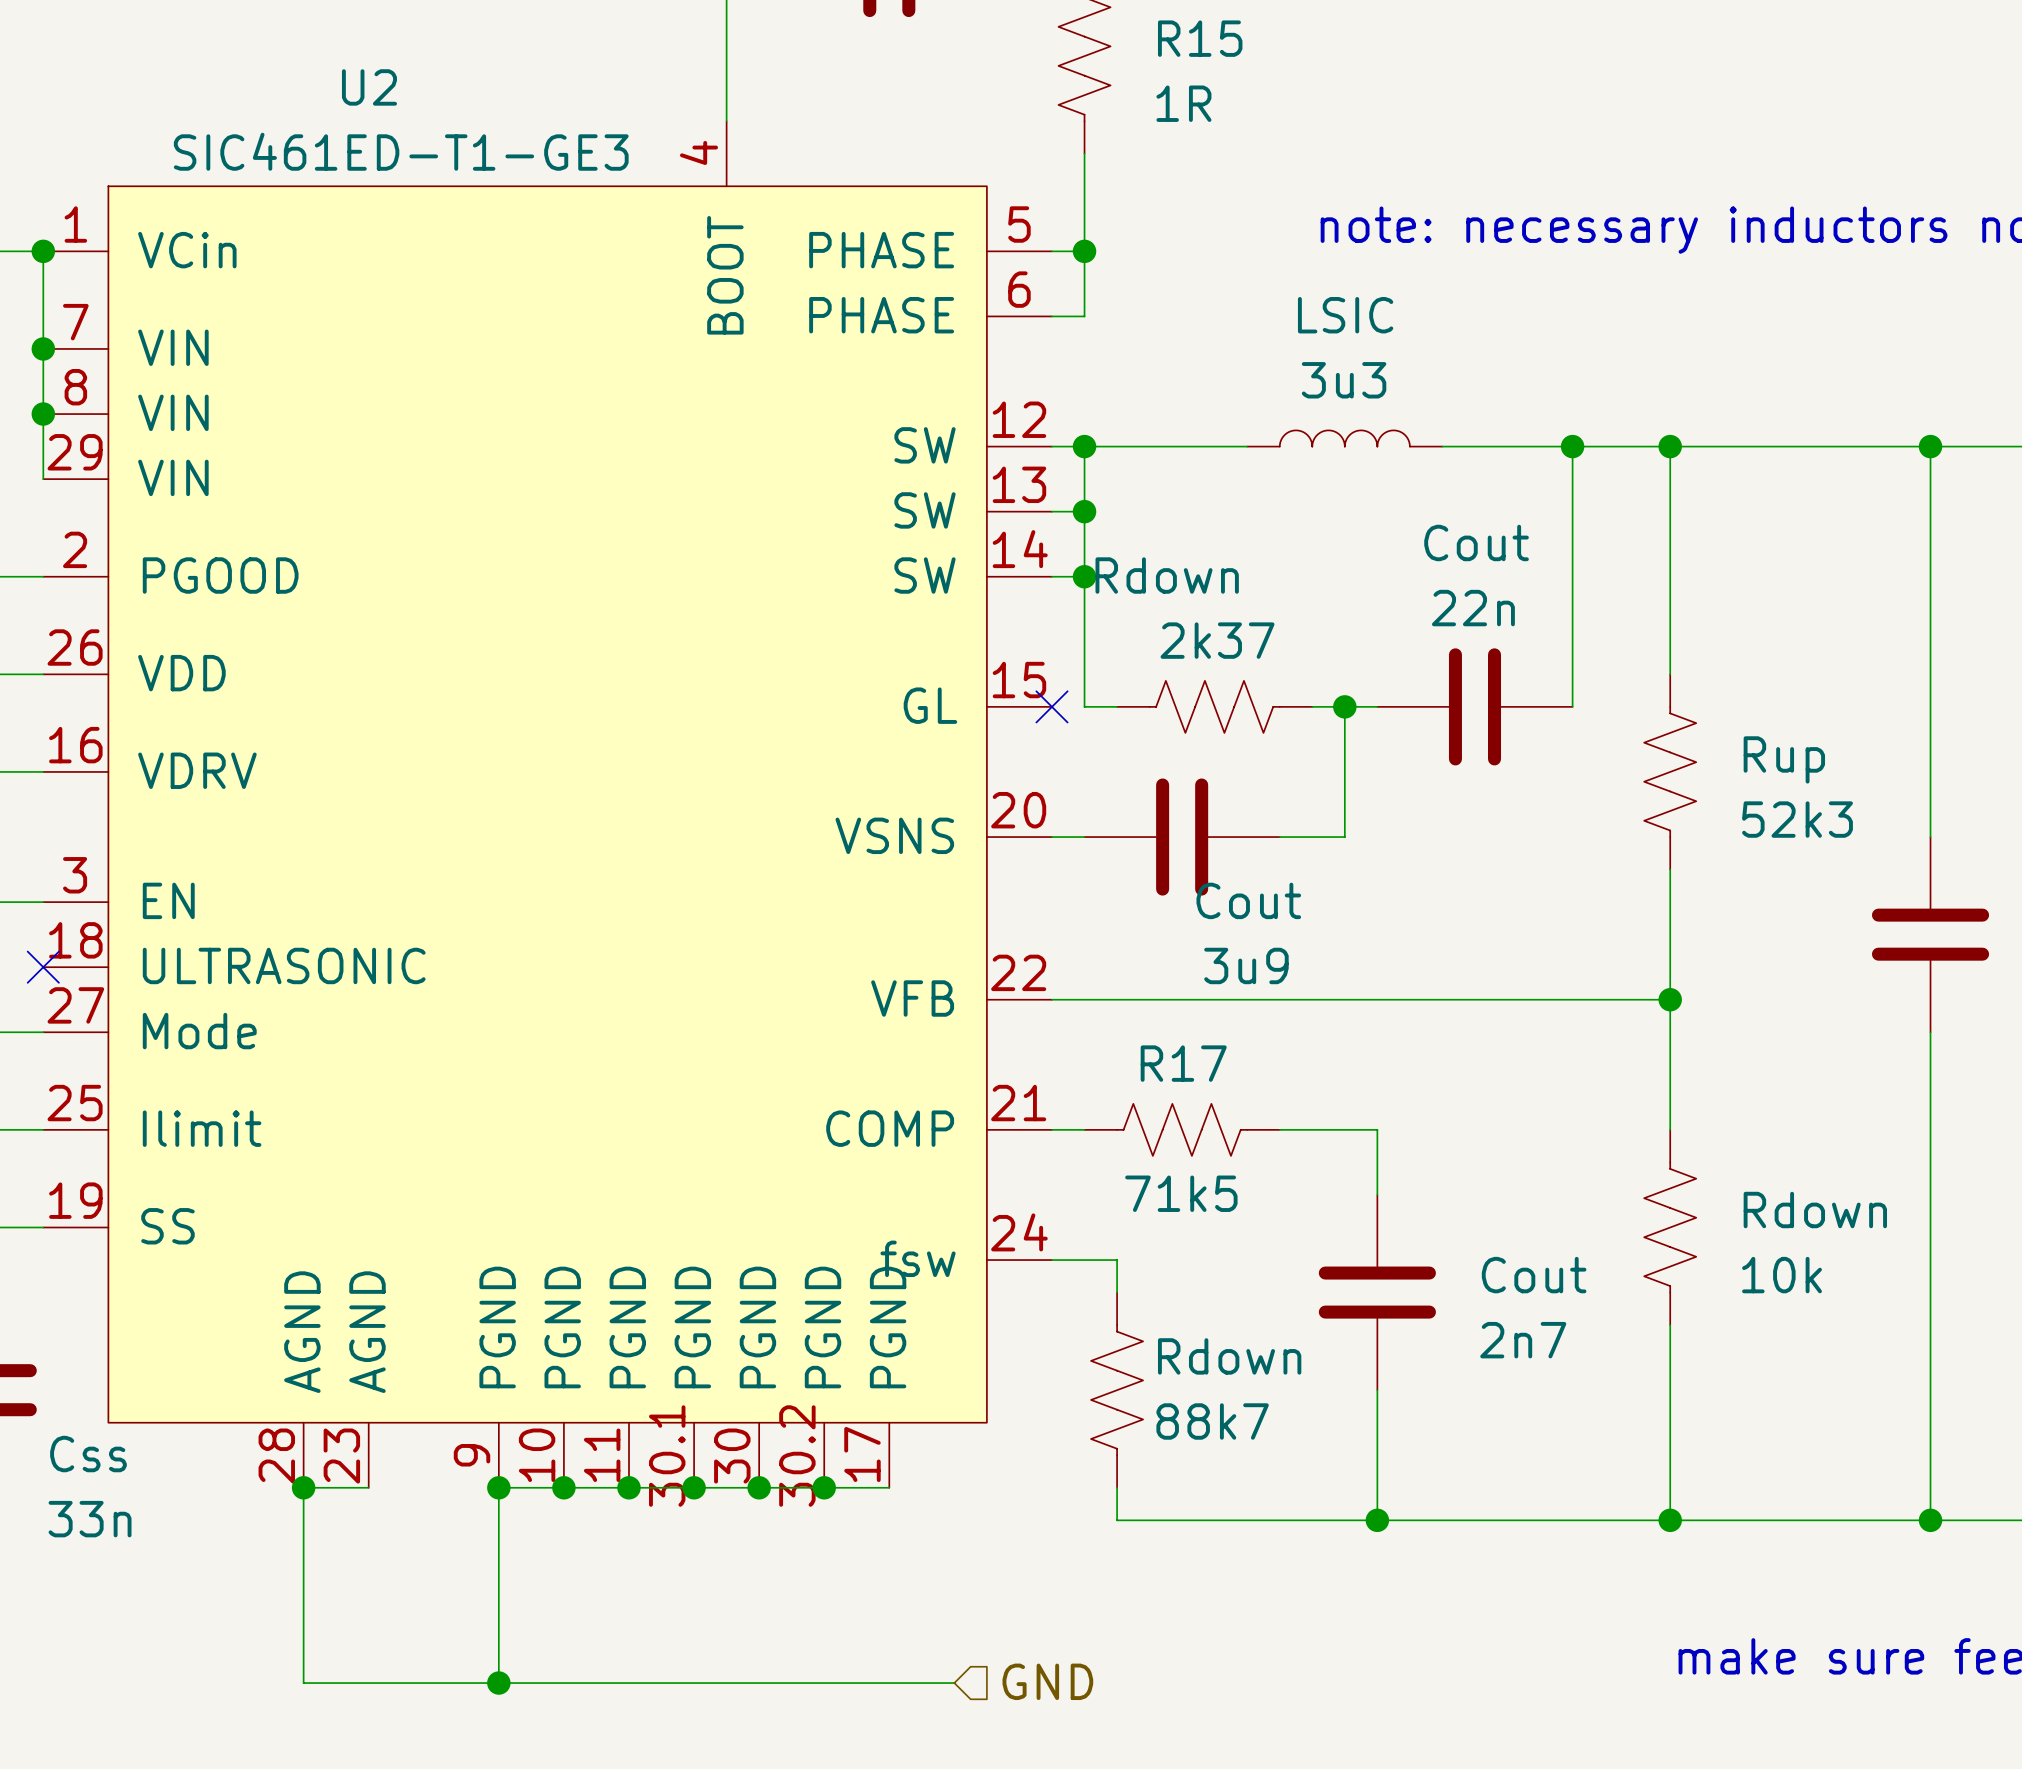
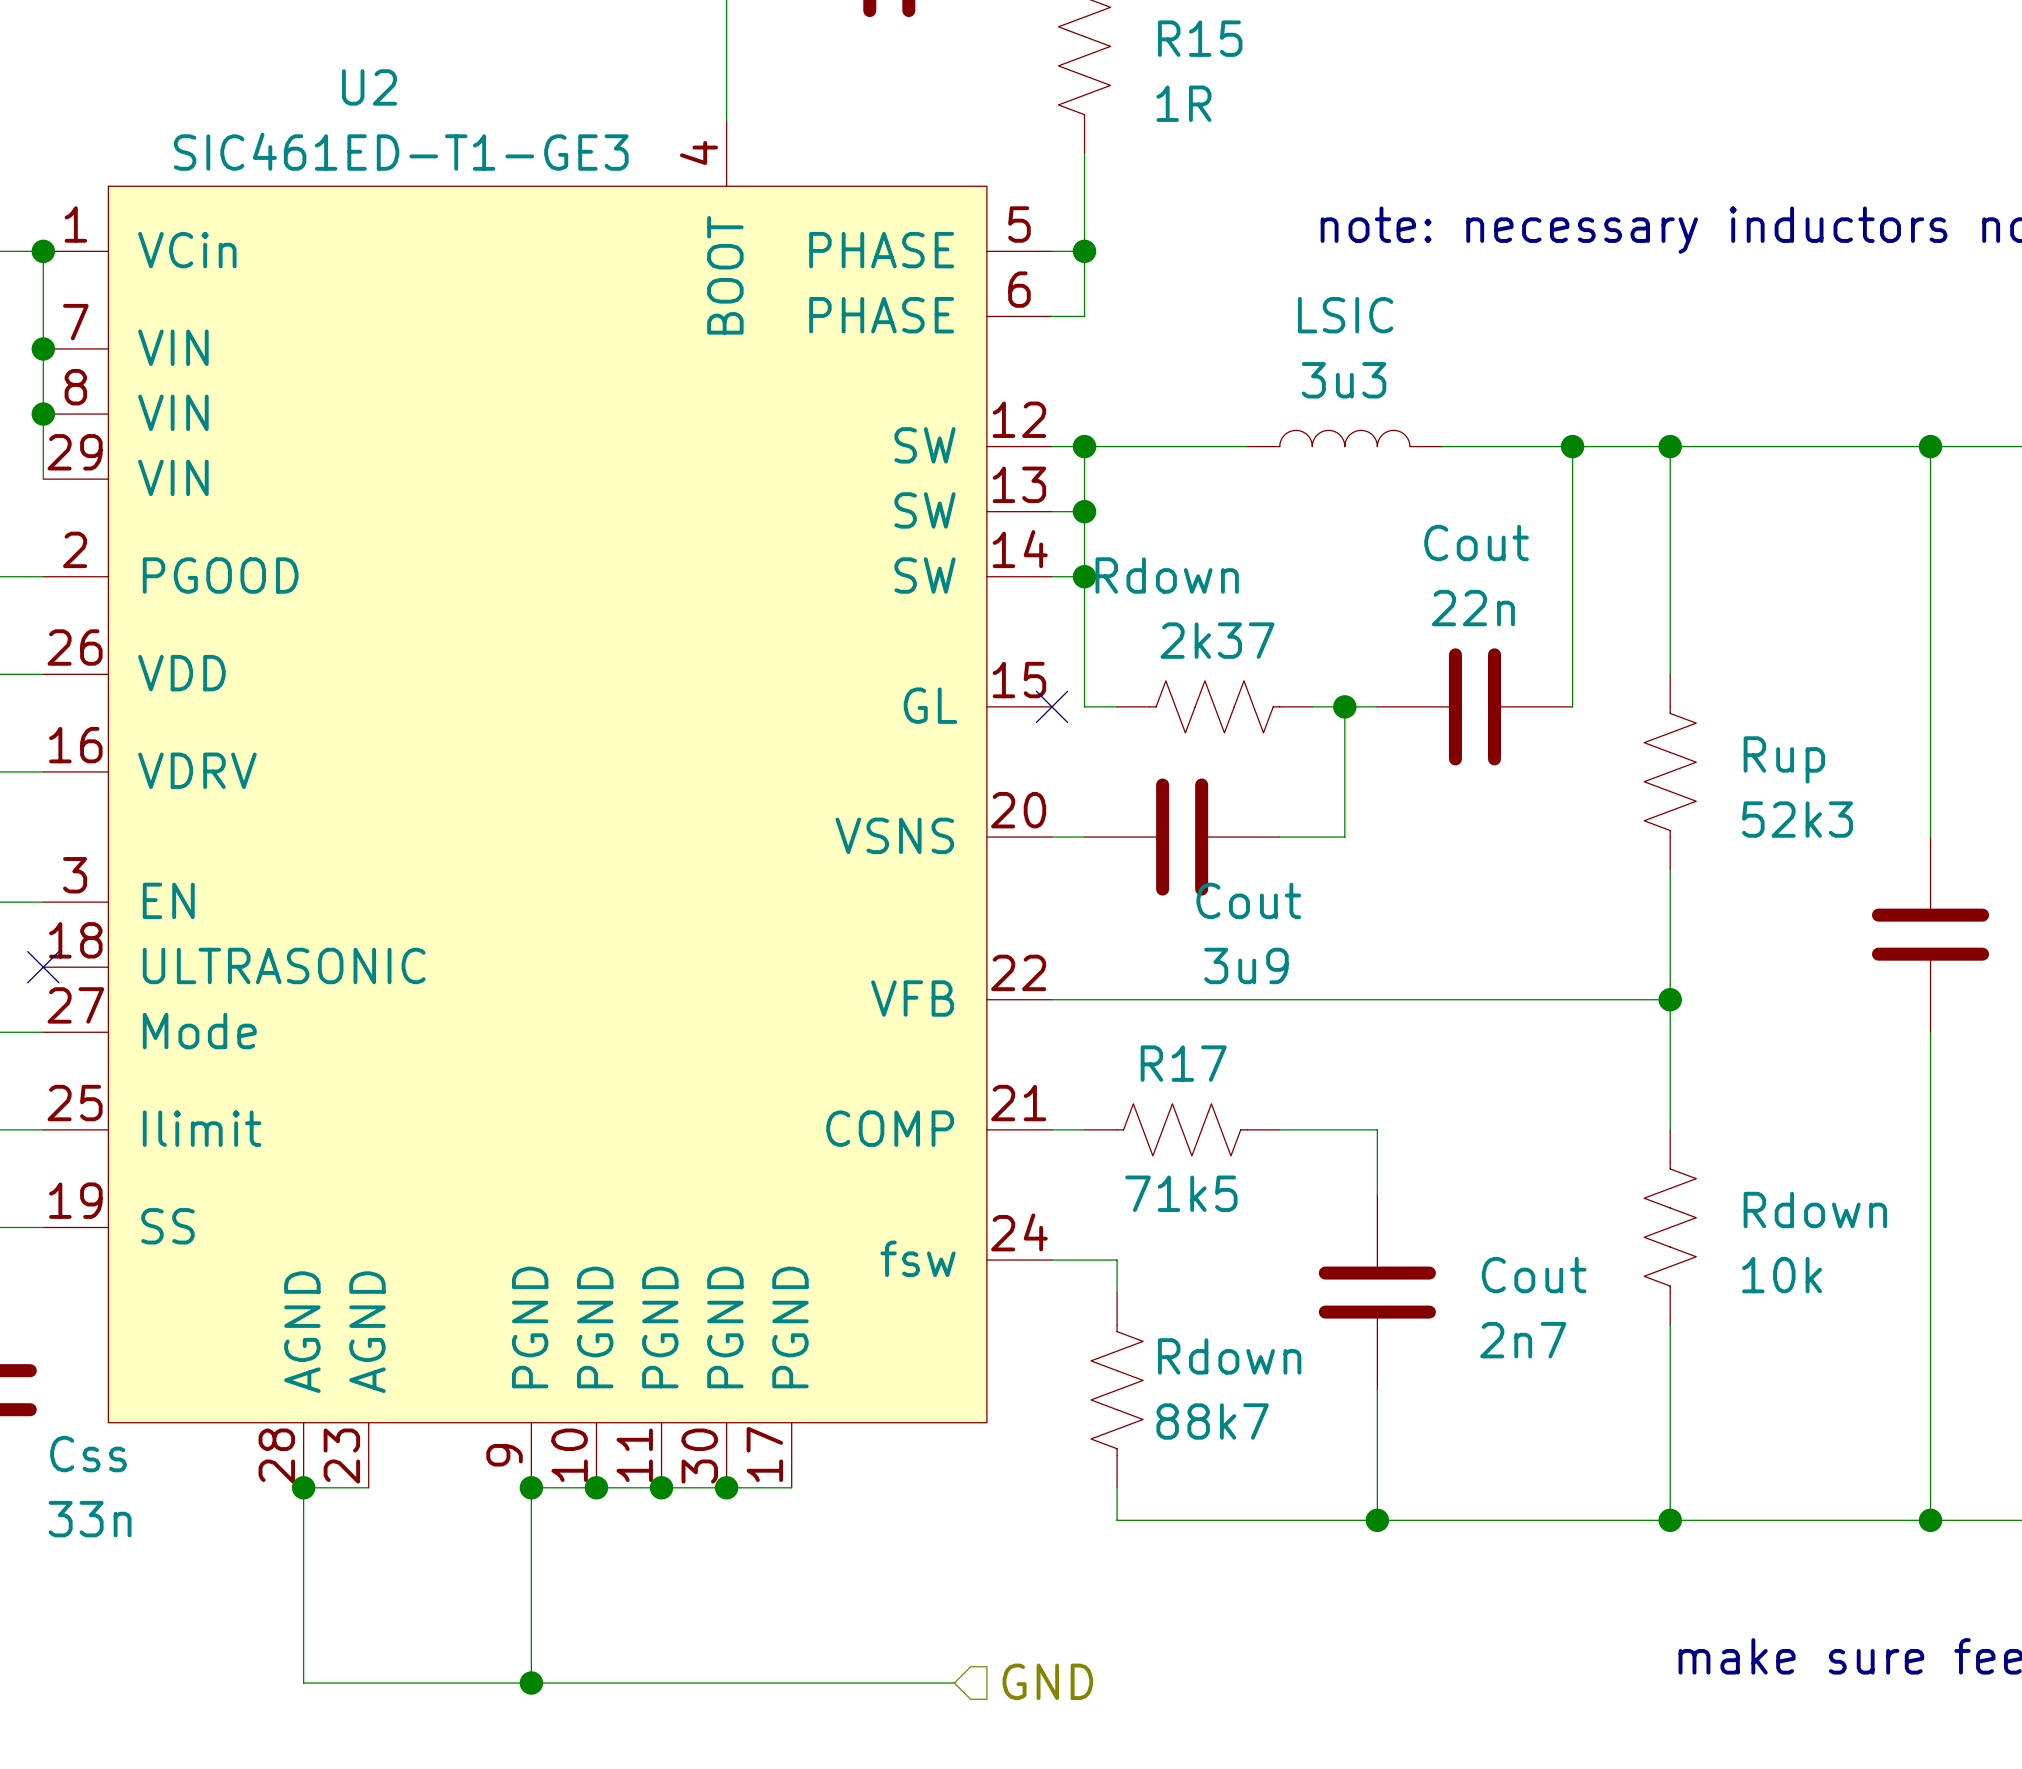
U2 symbol: [43, 121, 1052, 1488] -> [43, 121, 1052, 1488]
junction: (498, 1487) -> none
wire: (531, 1487) (498, 1487) (498, 1683) -> (531, 1487) (531, 1683)
junction: none -> (531, 1487)
junction: (563, 1487) -> none
junction: none -> (596, 1487)
junction: (629, 1487) -> none
junction: none -> (661, 1487)
junction: (694, 1487) -> none
junction: none -> (726, 1487)
junction: (759, 1487) -> none
wire: (791, 1487) (889, 1487) -> none
junction: (824, 1487) -> none
junction position: (498, 1683) -> (531, 1683)

